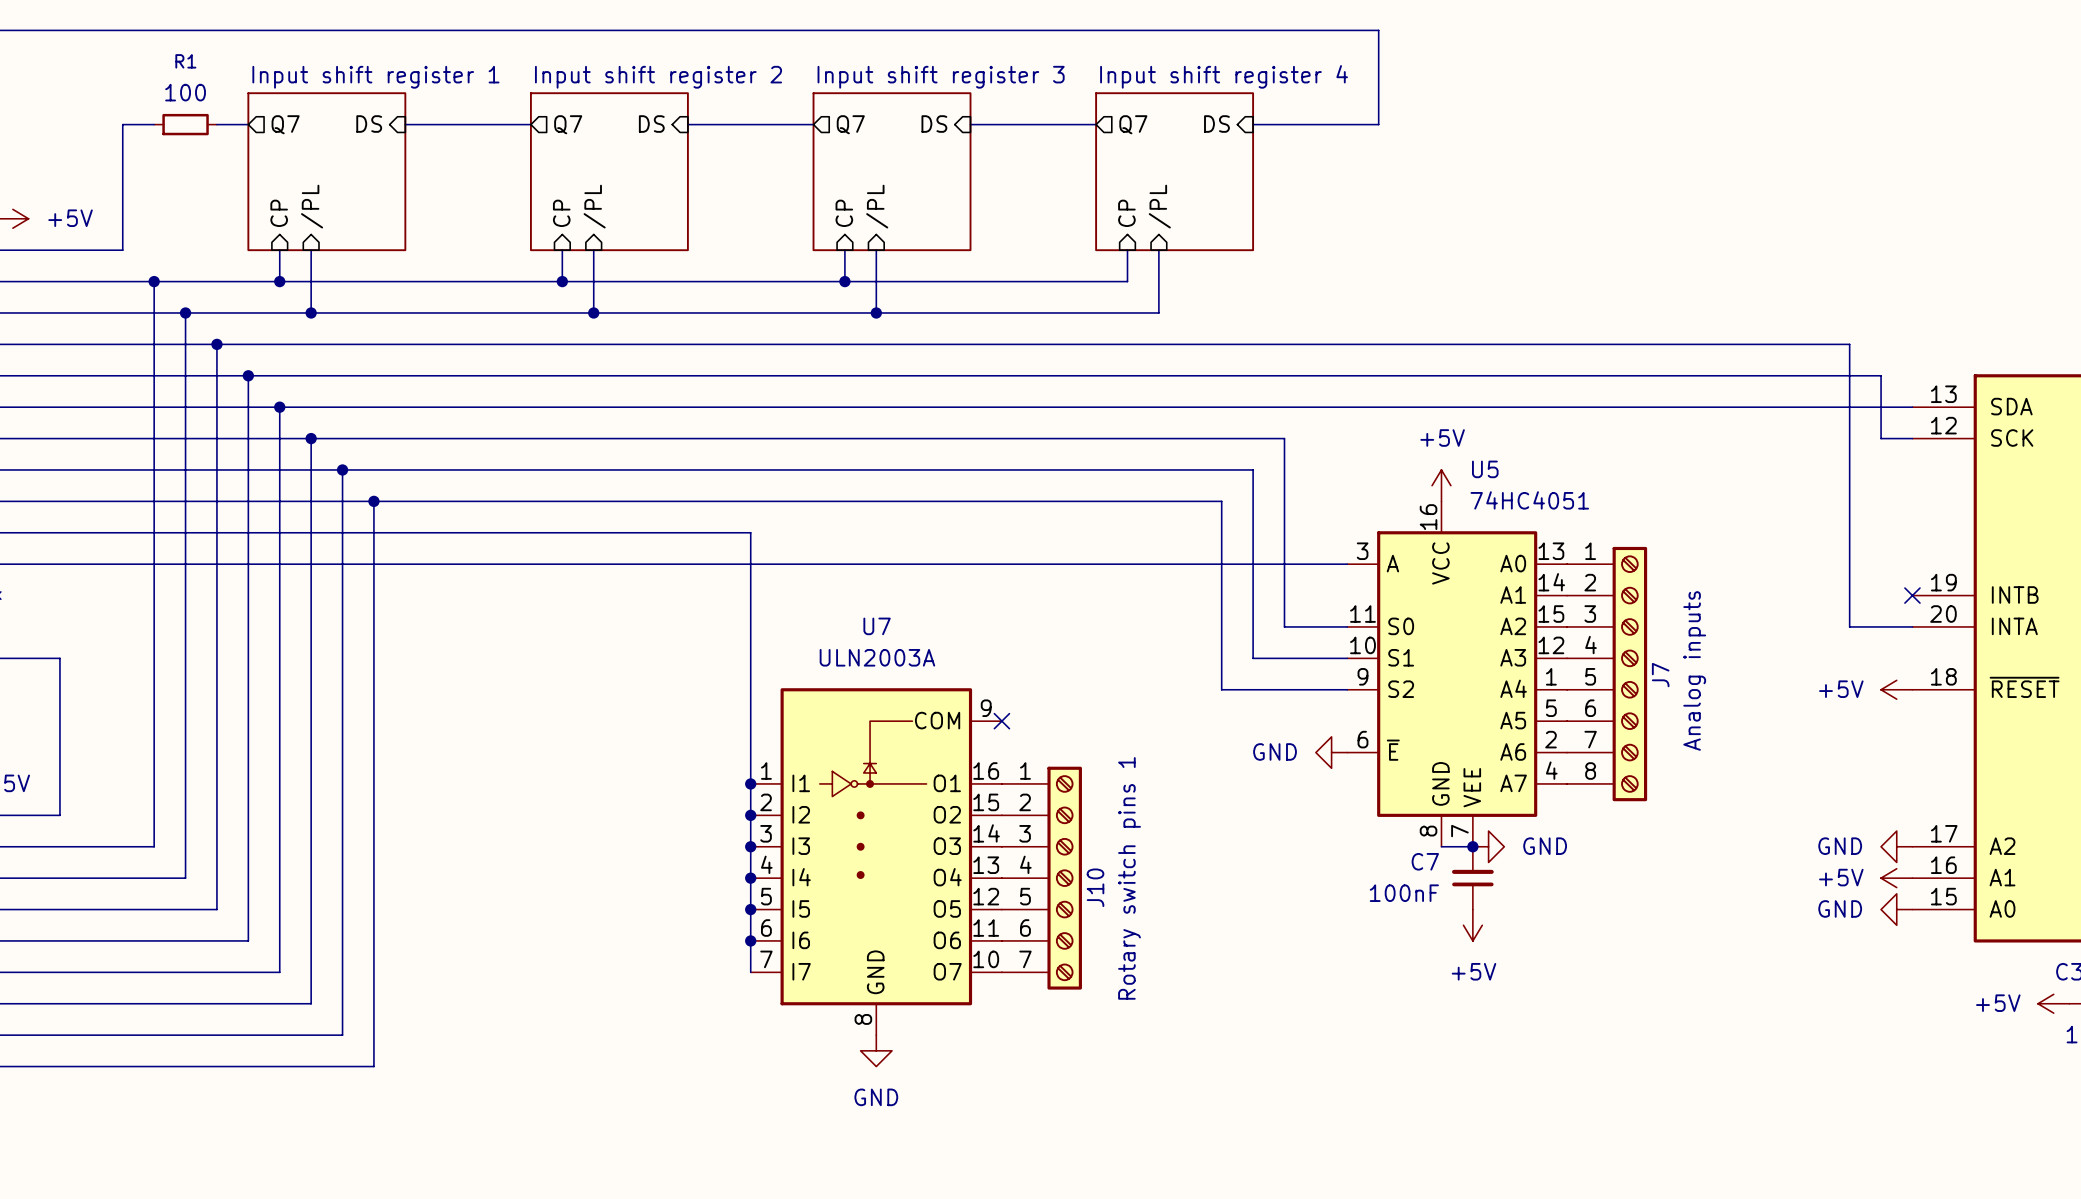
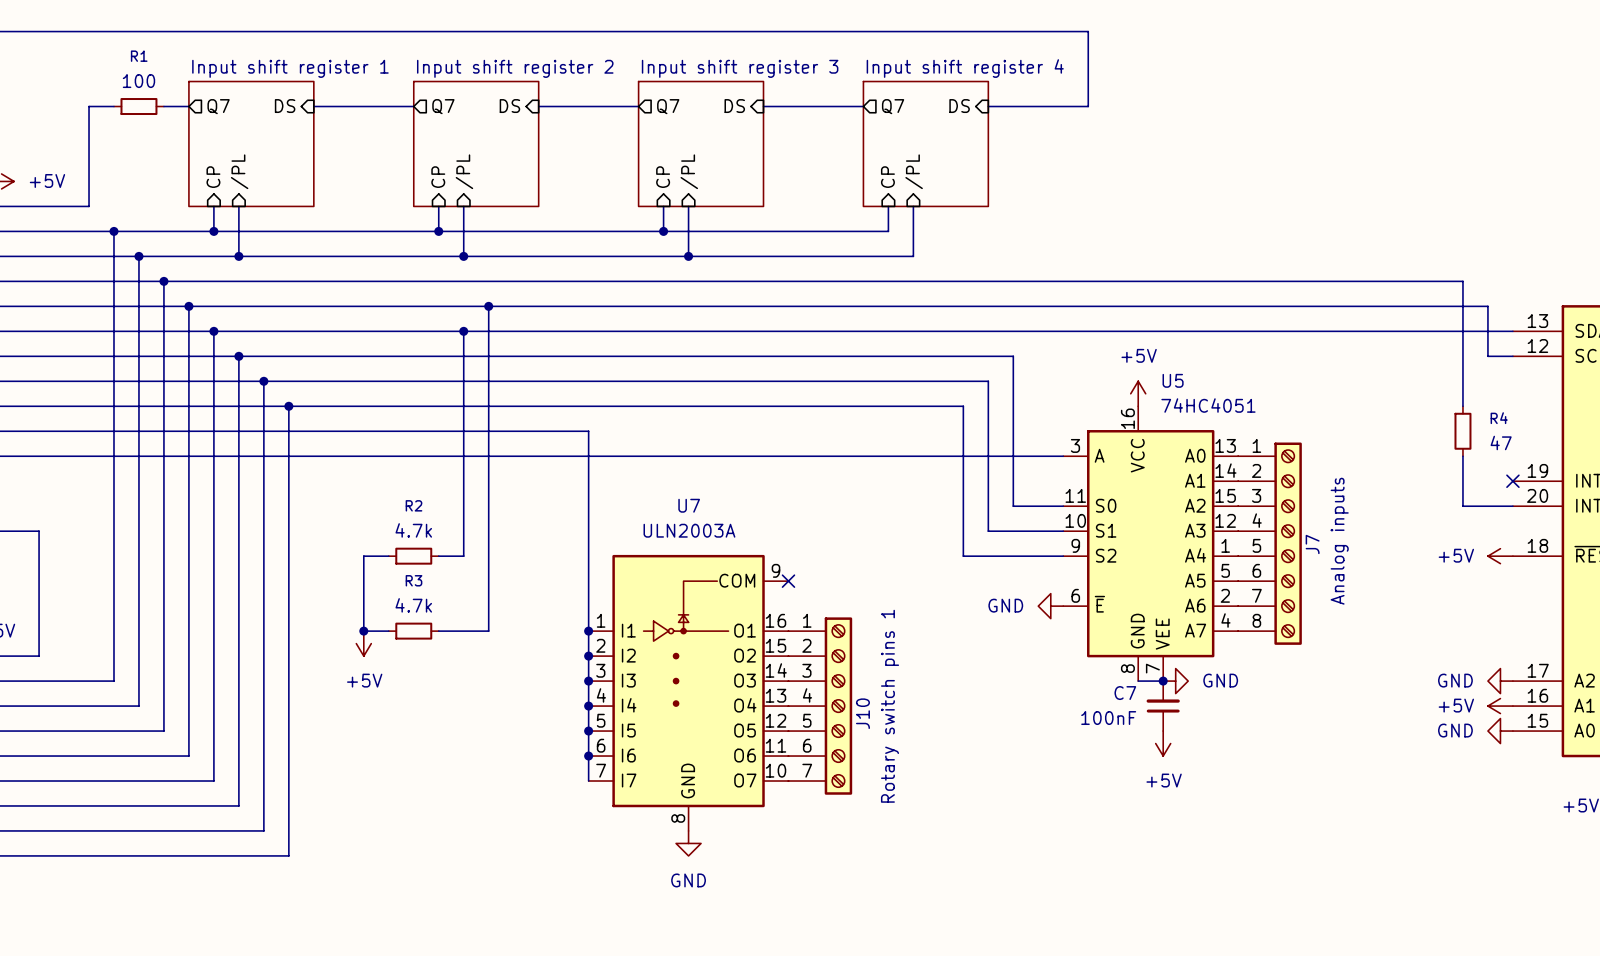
wire: none -> (488, 306) (488, 631) (438, 631)
junction: none -> (488, 306)
wire: none -> (463, 331) (463, 556) (438, 556)
junction: none -> (463, 331)
wire: (1849, 501) (1849, 564) -> none
R4: none -> 47 (1462, 431)
wire: none -> (388, 556) (363, 556) (363, 631) (388, 631)
R2: none -> 4.7k (413, 556)
junction: none -> (363, 631)
R3: none -> 4.7k (413, 631)
power symbol: none -> +5V (363, 643)

